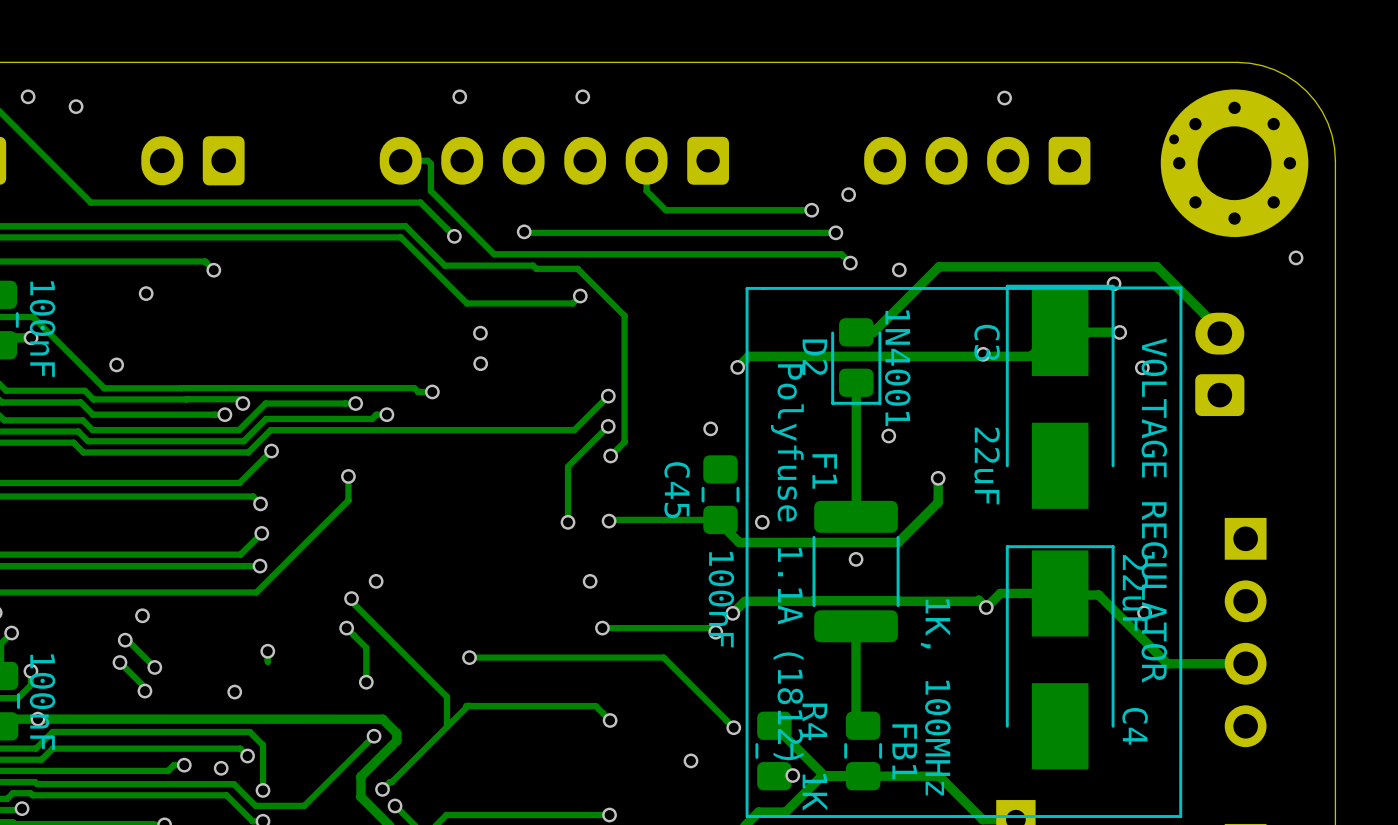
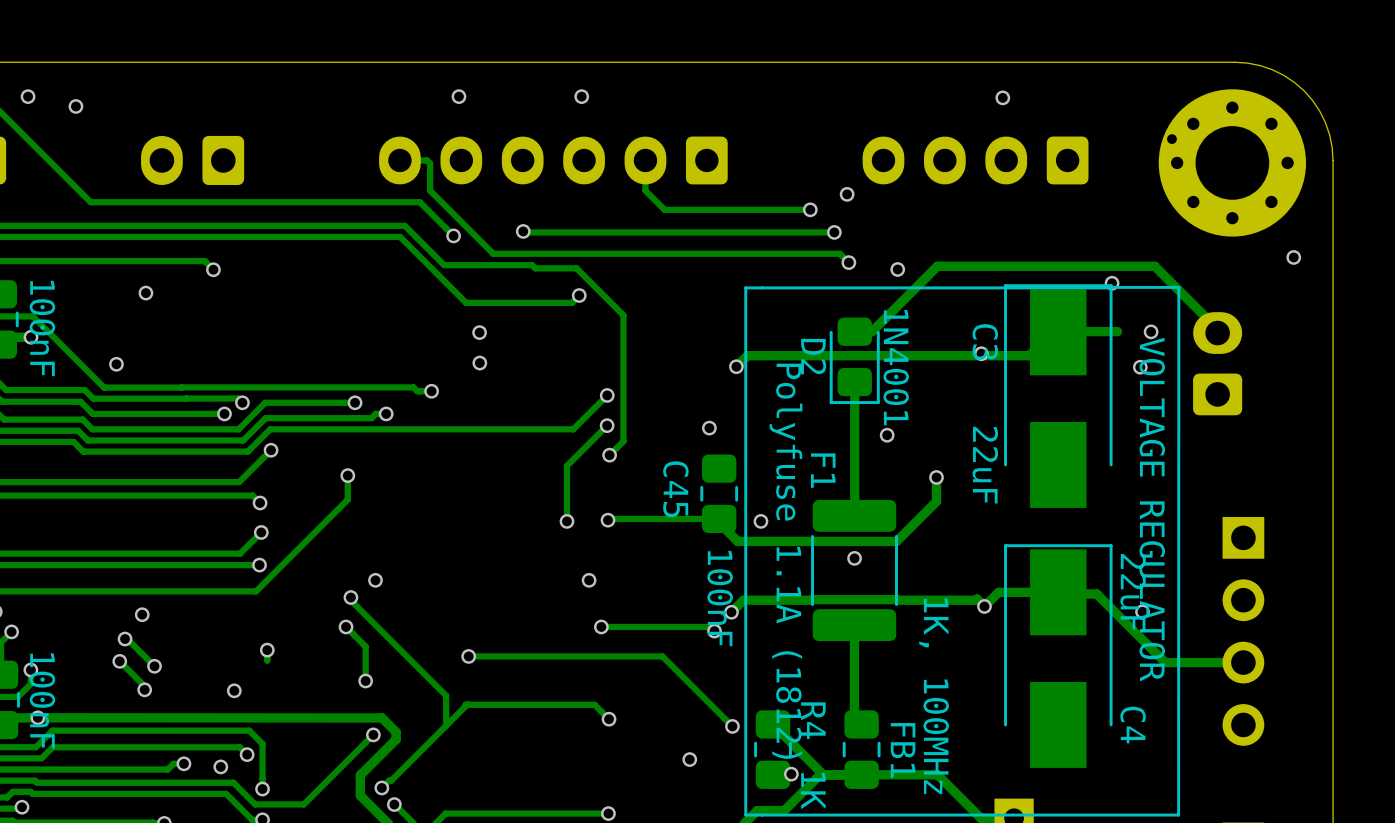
via position: (1119, 332) -> (1151, 331)

